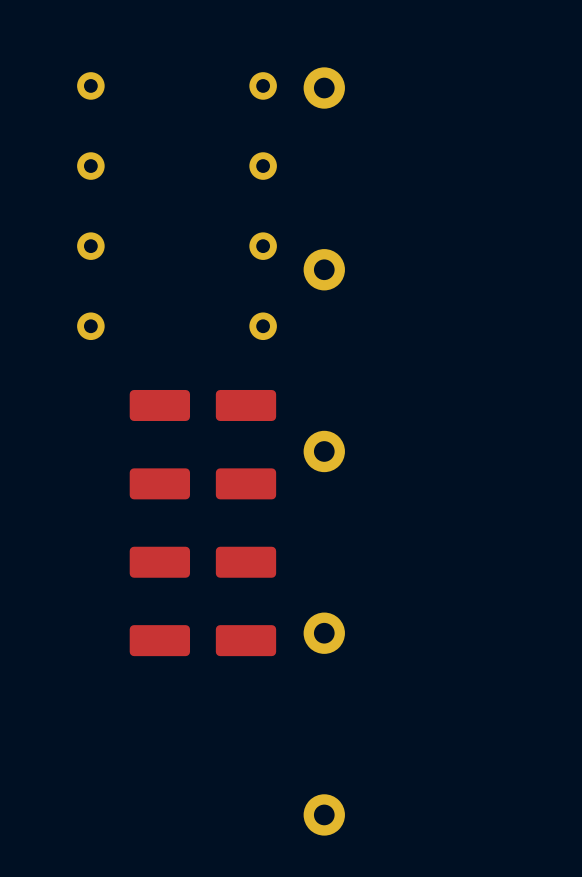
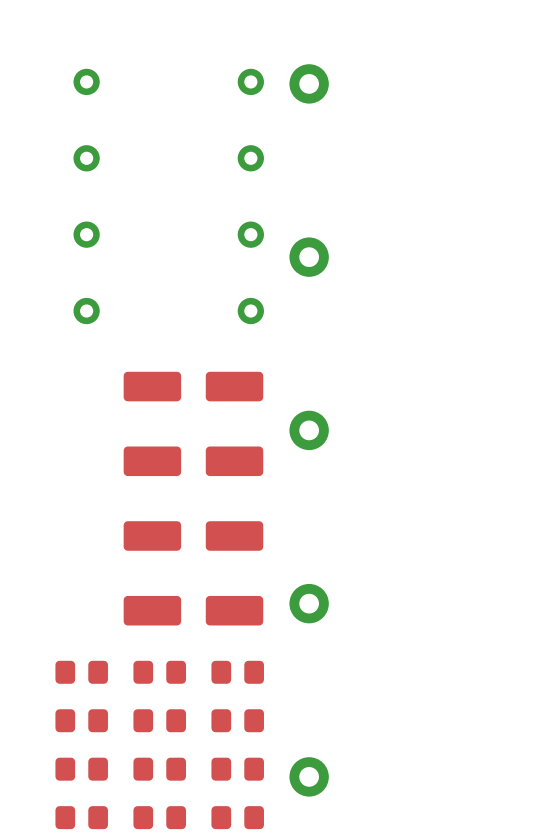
part: none -> (81, 672)
part: none -> (159, 672)
part: none -> (237, 672)
part: none -> (81, 720)
part: none -> (159, 720)
part: none -> (237, 720)
part: none -> (81, 769)
part: none -> (159, 769)
part: none -> (237, 769)
part: none -> (81, 817)
part: none -> (159, 817)
part: none -> (237, 817)

